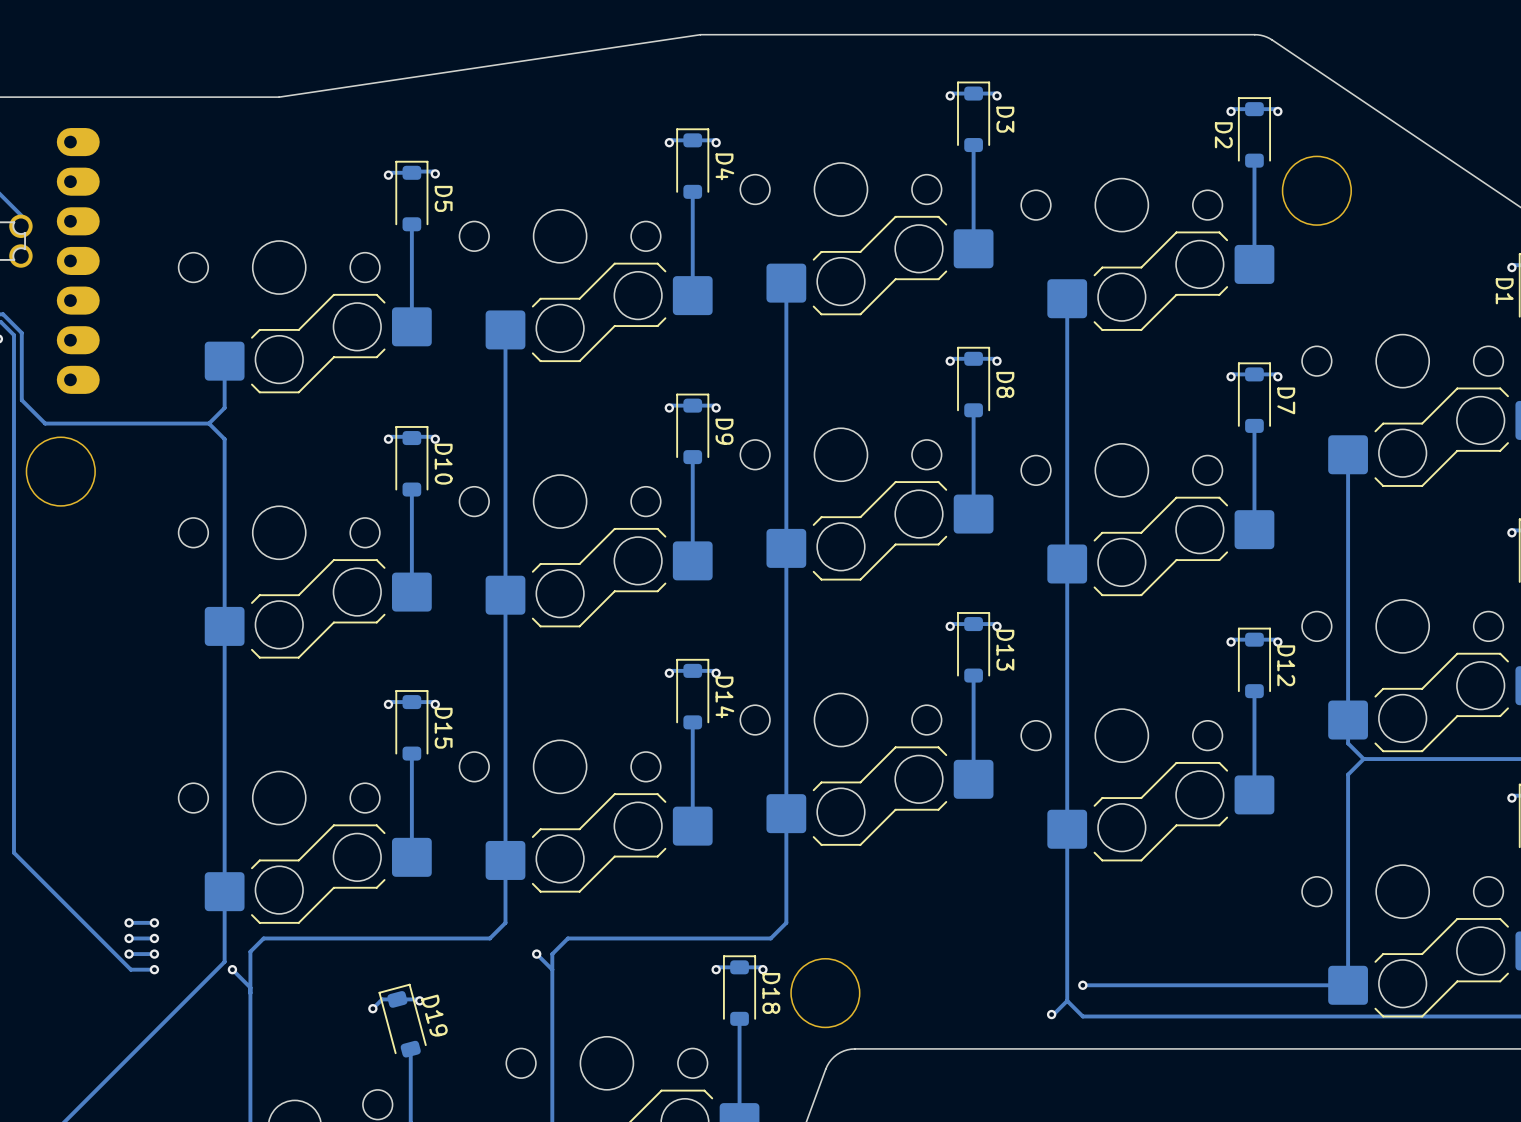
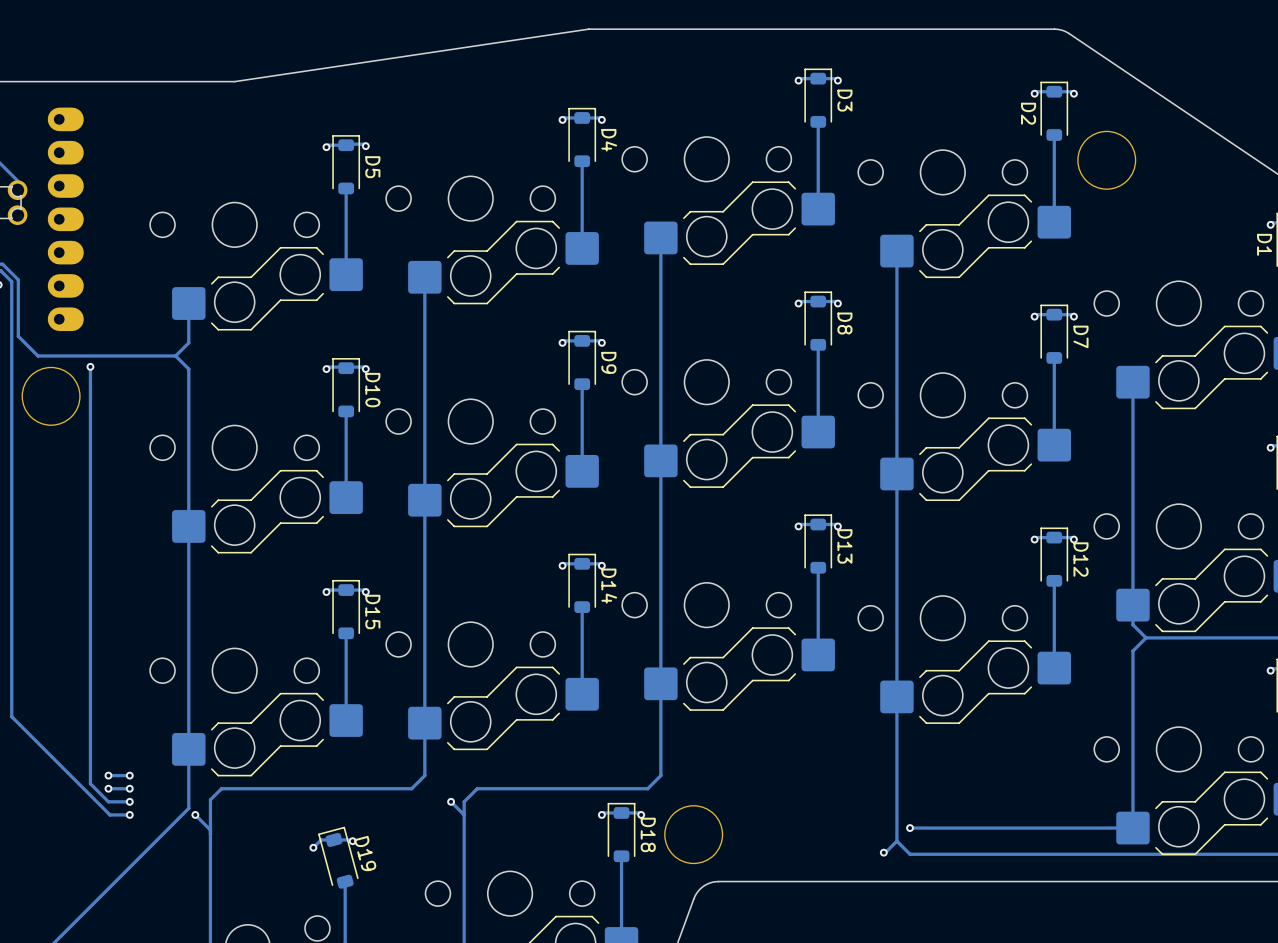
track: none -> (90, 366) (90, 783) (108, 801)
via: none -> (90, 366)
via: (129, 954) -> none

